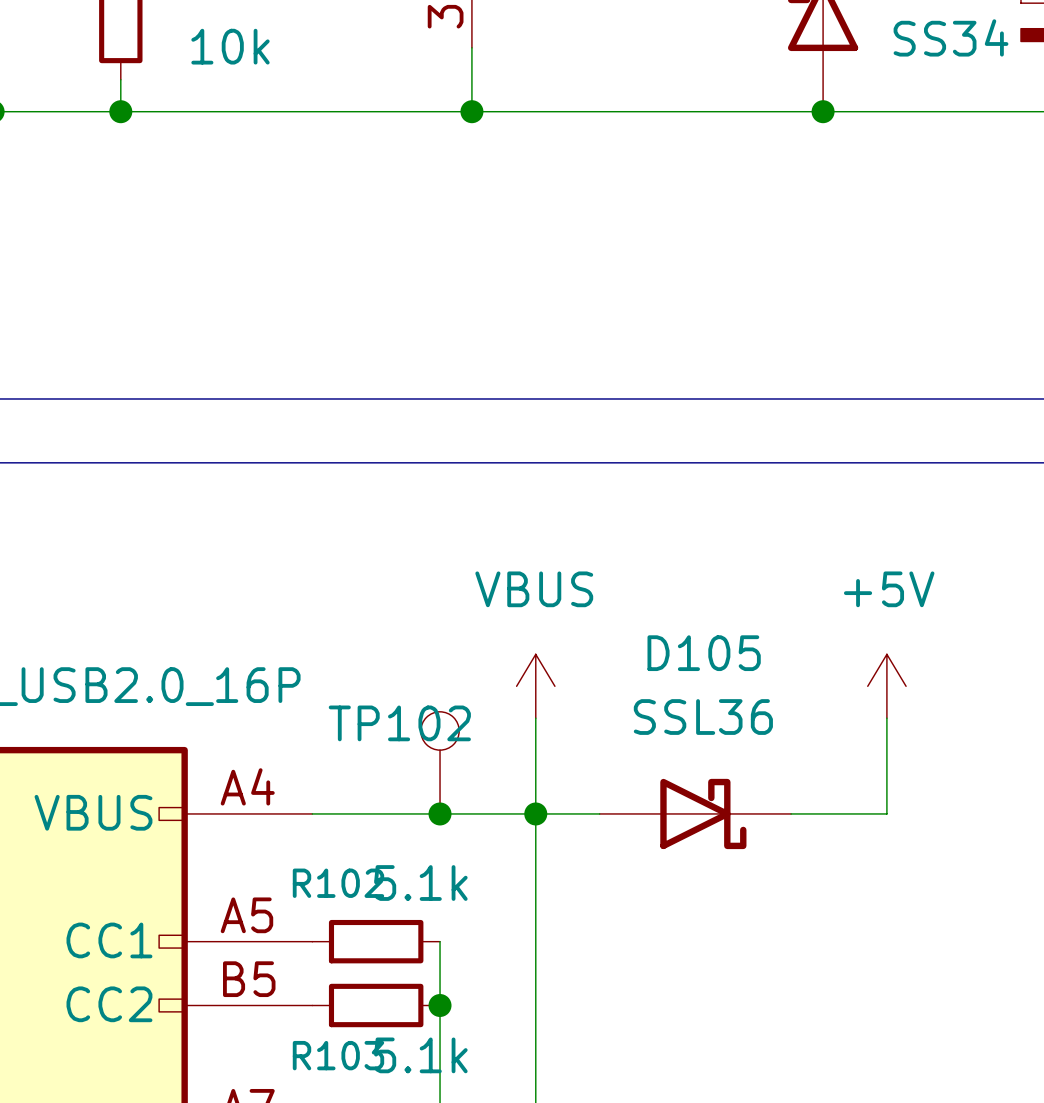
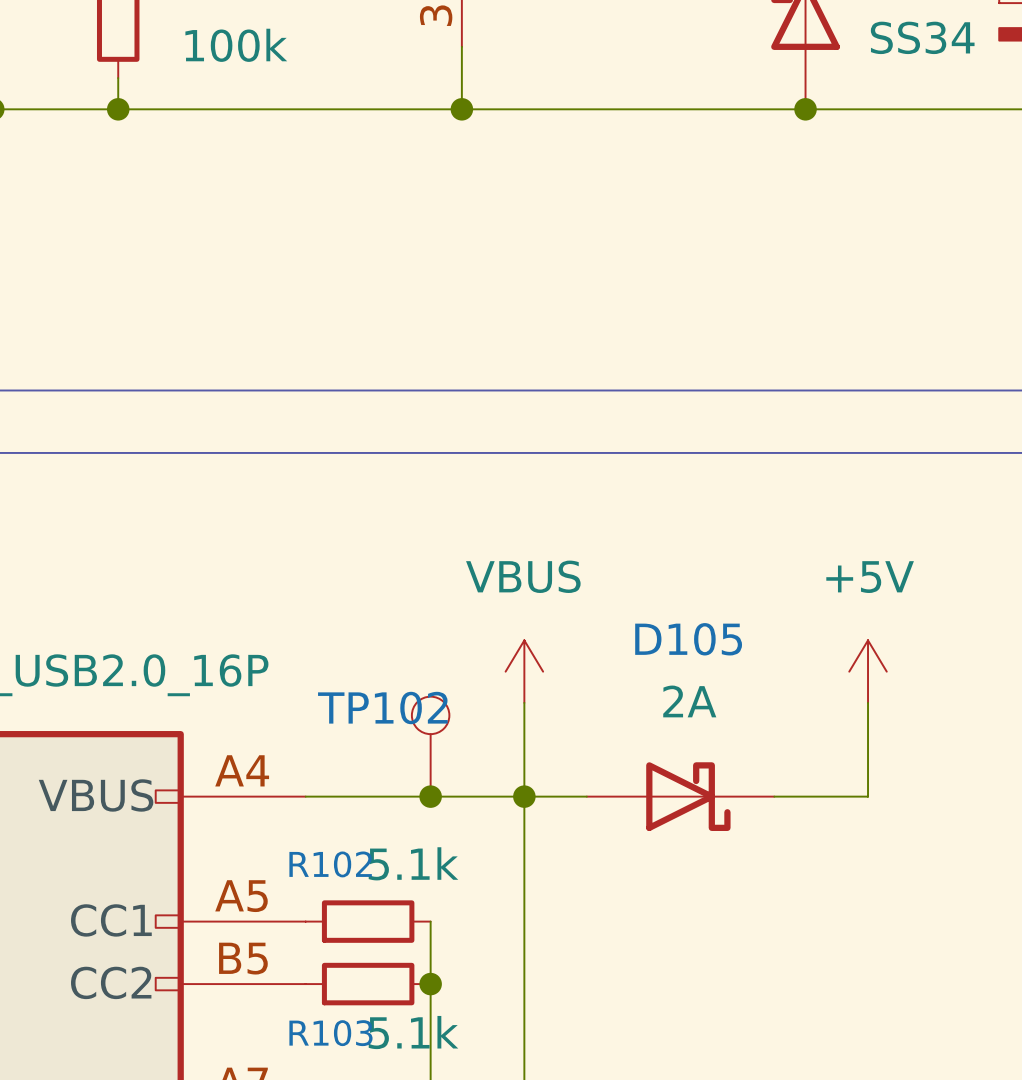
part value: 10k (230, 46) -> 100k (236, 45)
D105 value: SSL36 (703, 717) -> 2A (689, 701)

